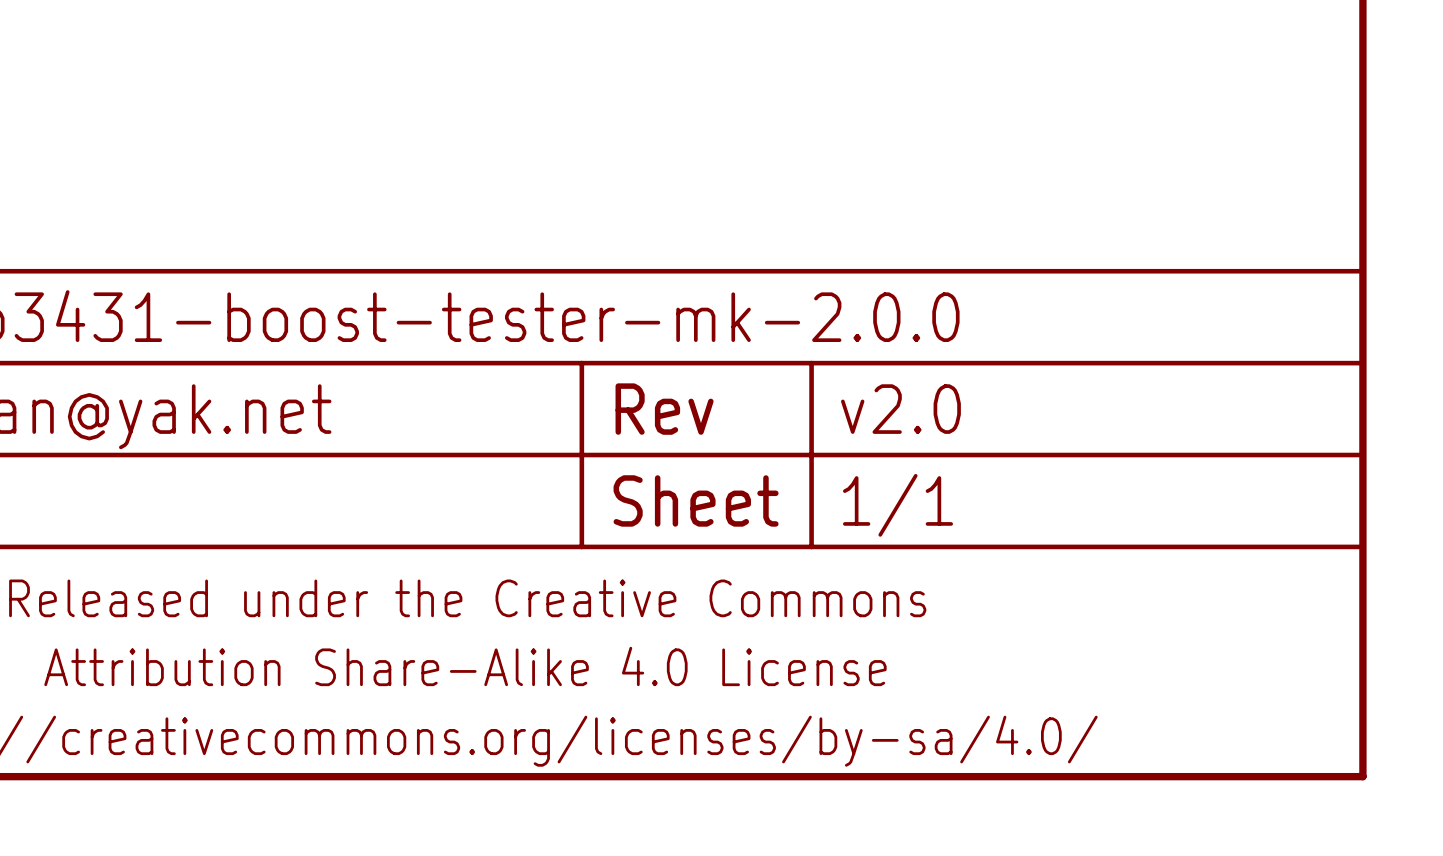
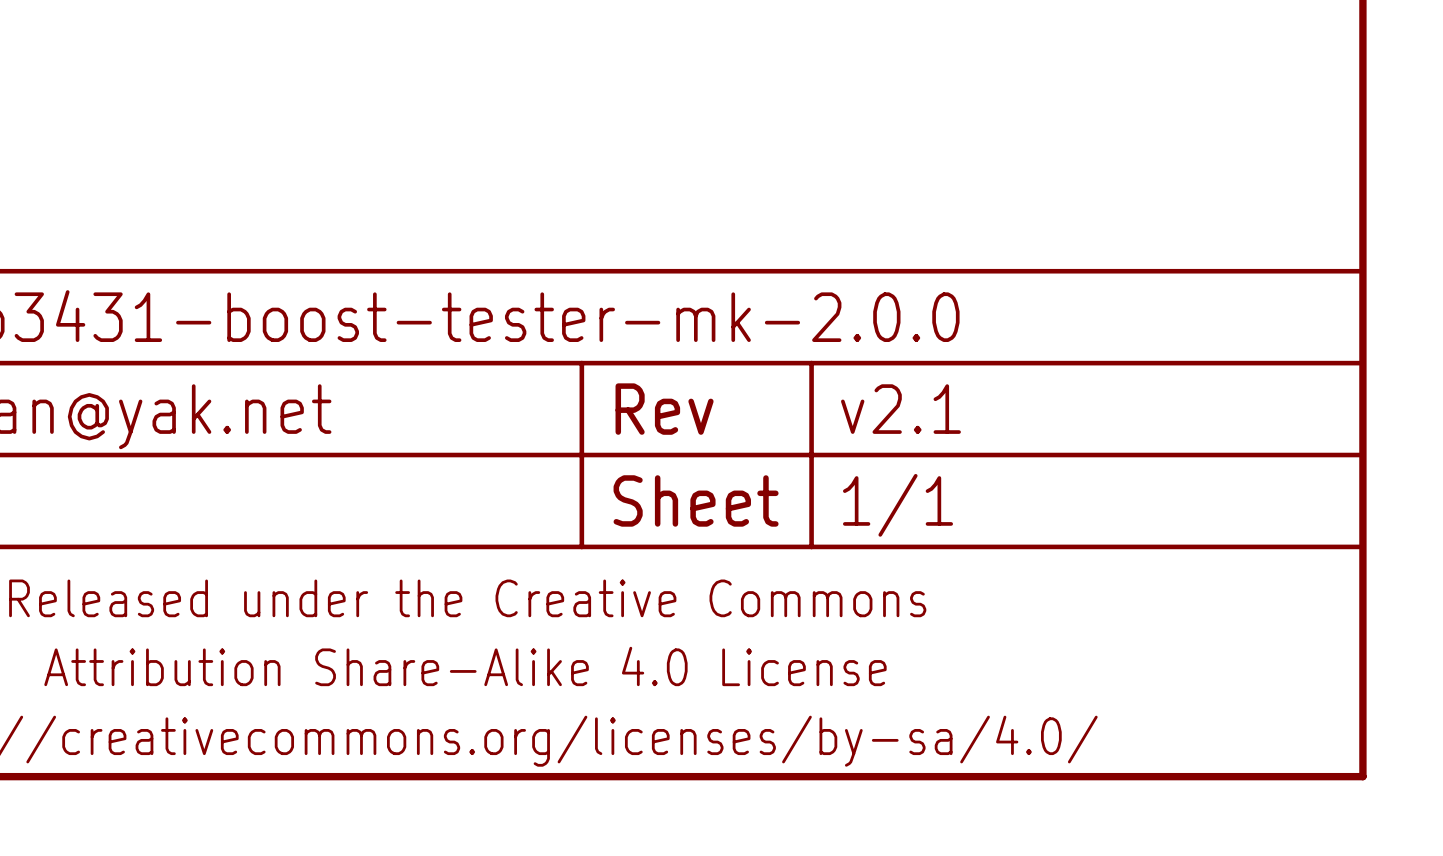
part text: v2.0 (900, 409) -> v2.1 (900, 409)

